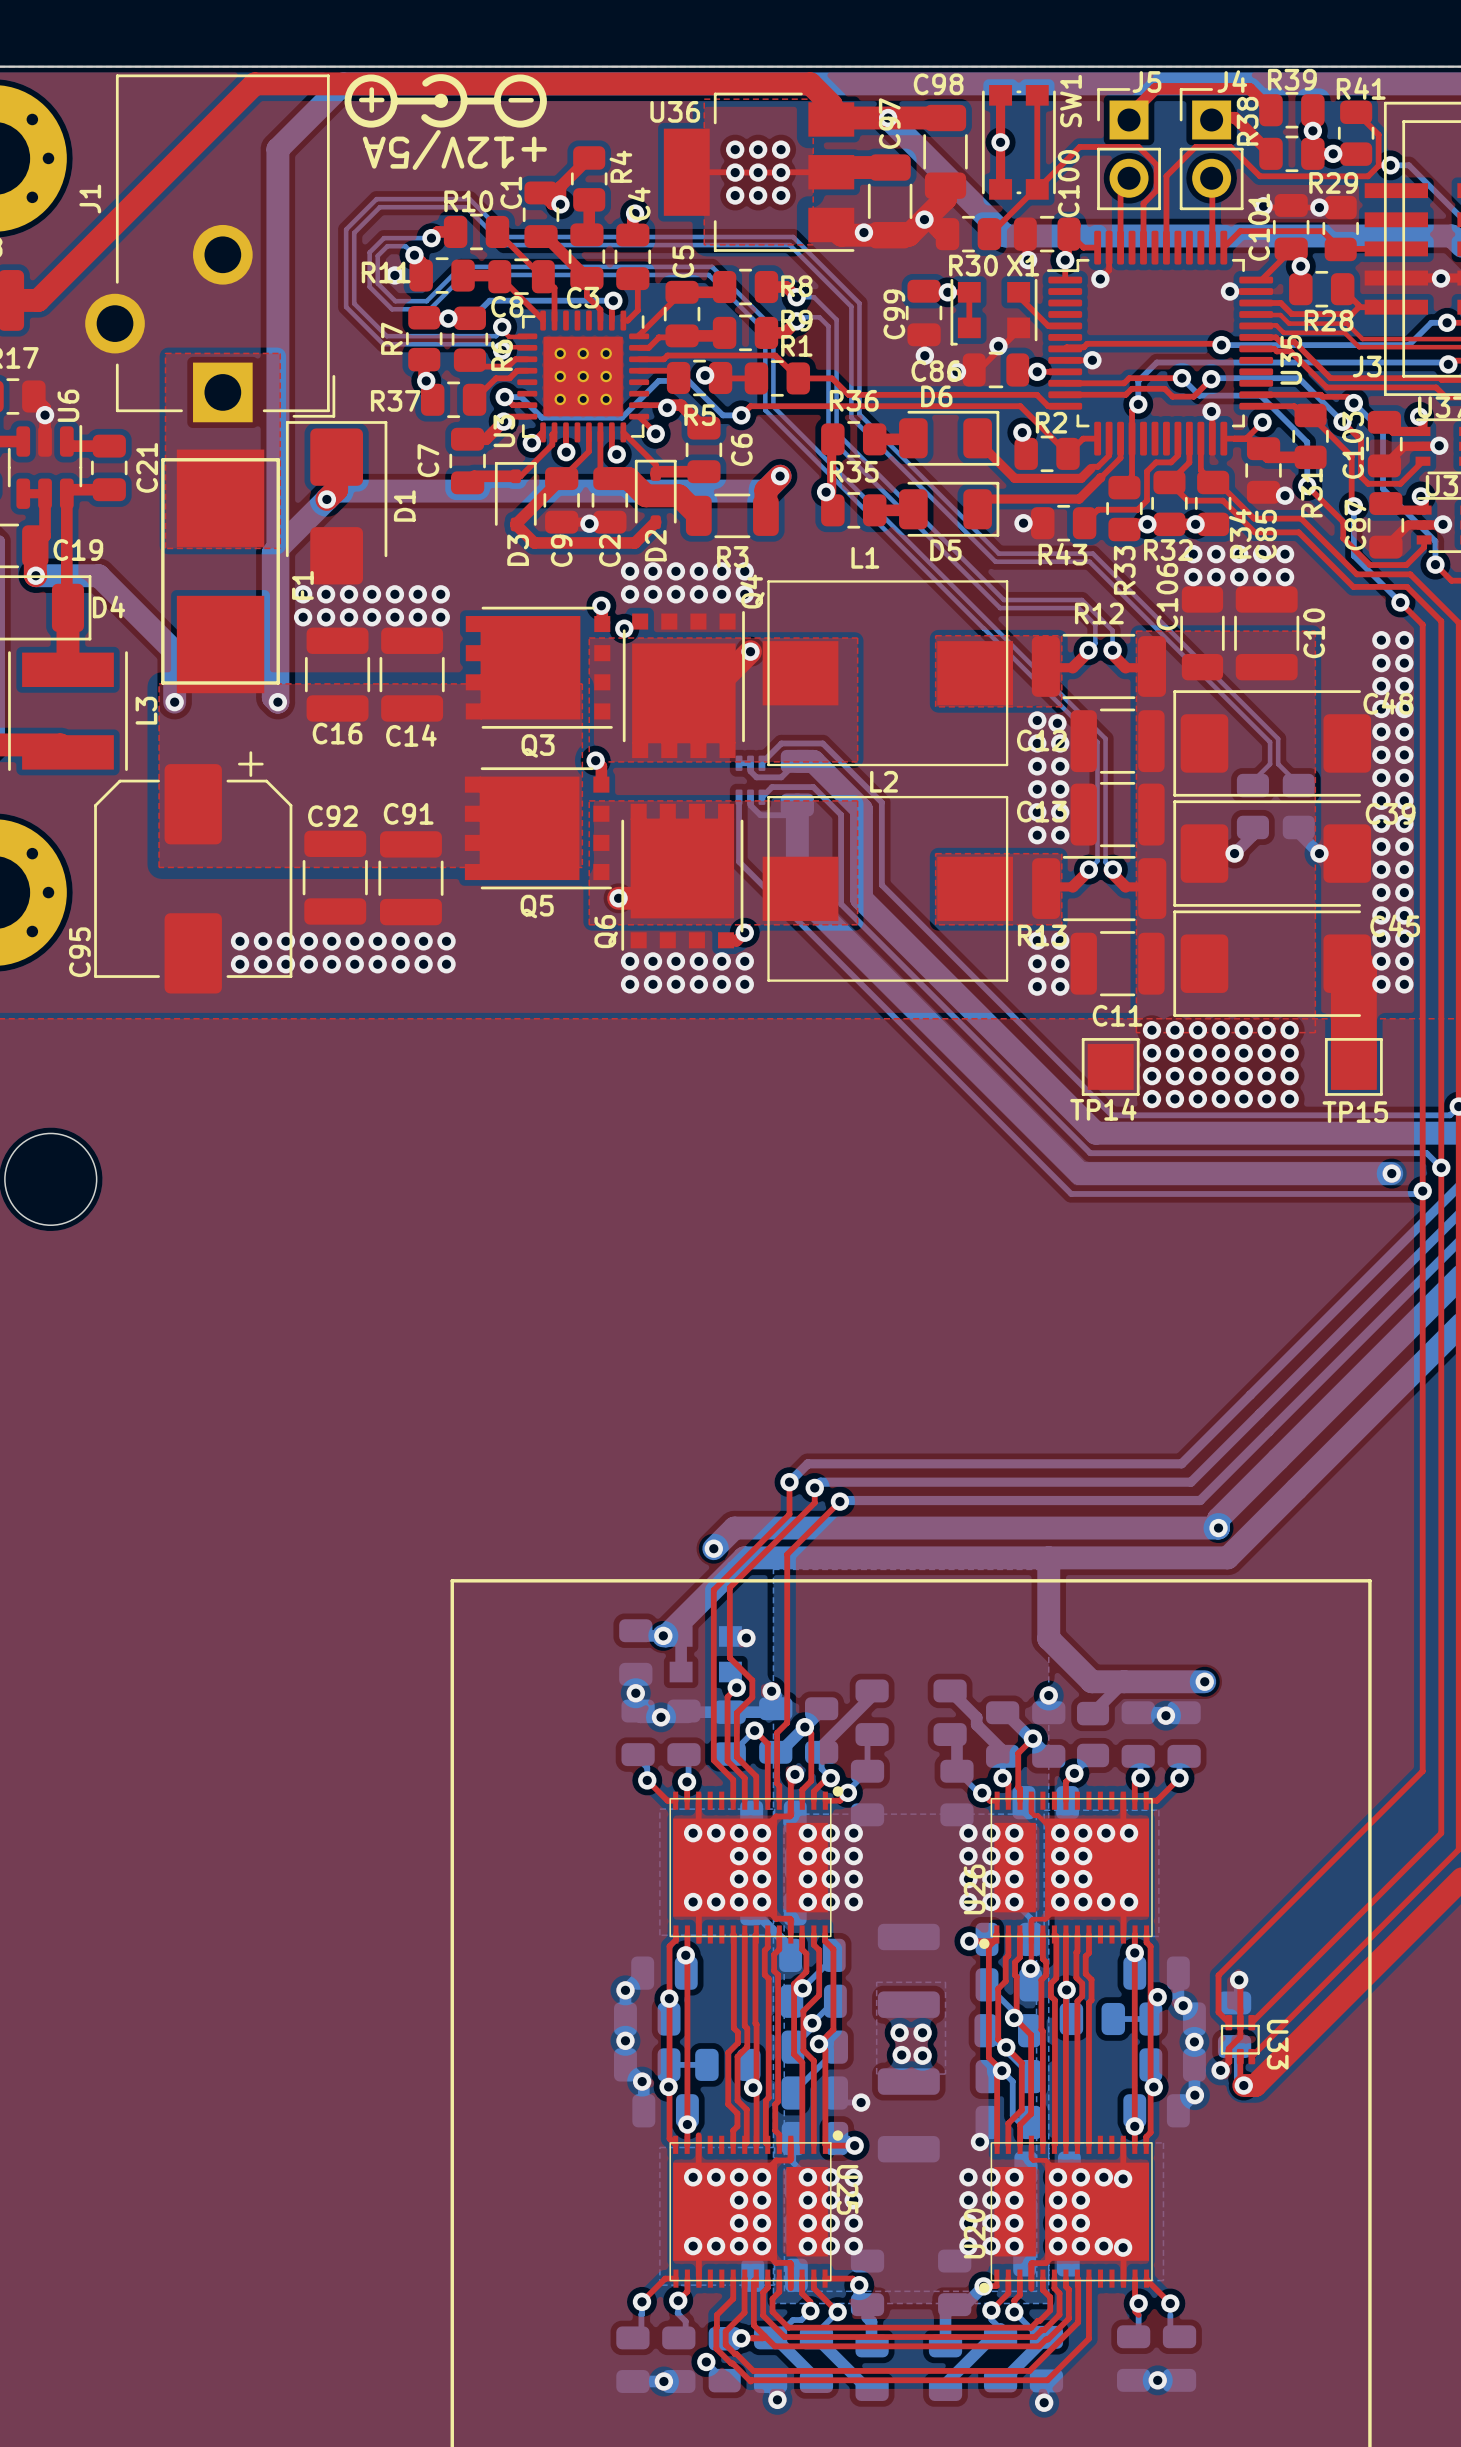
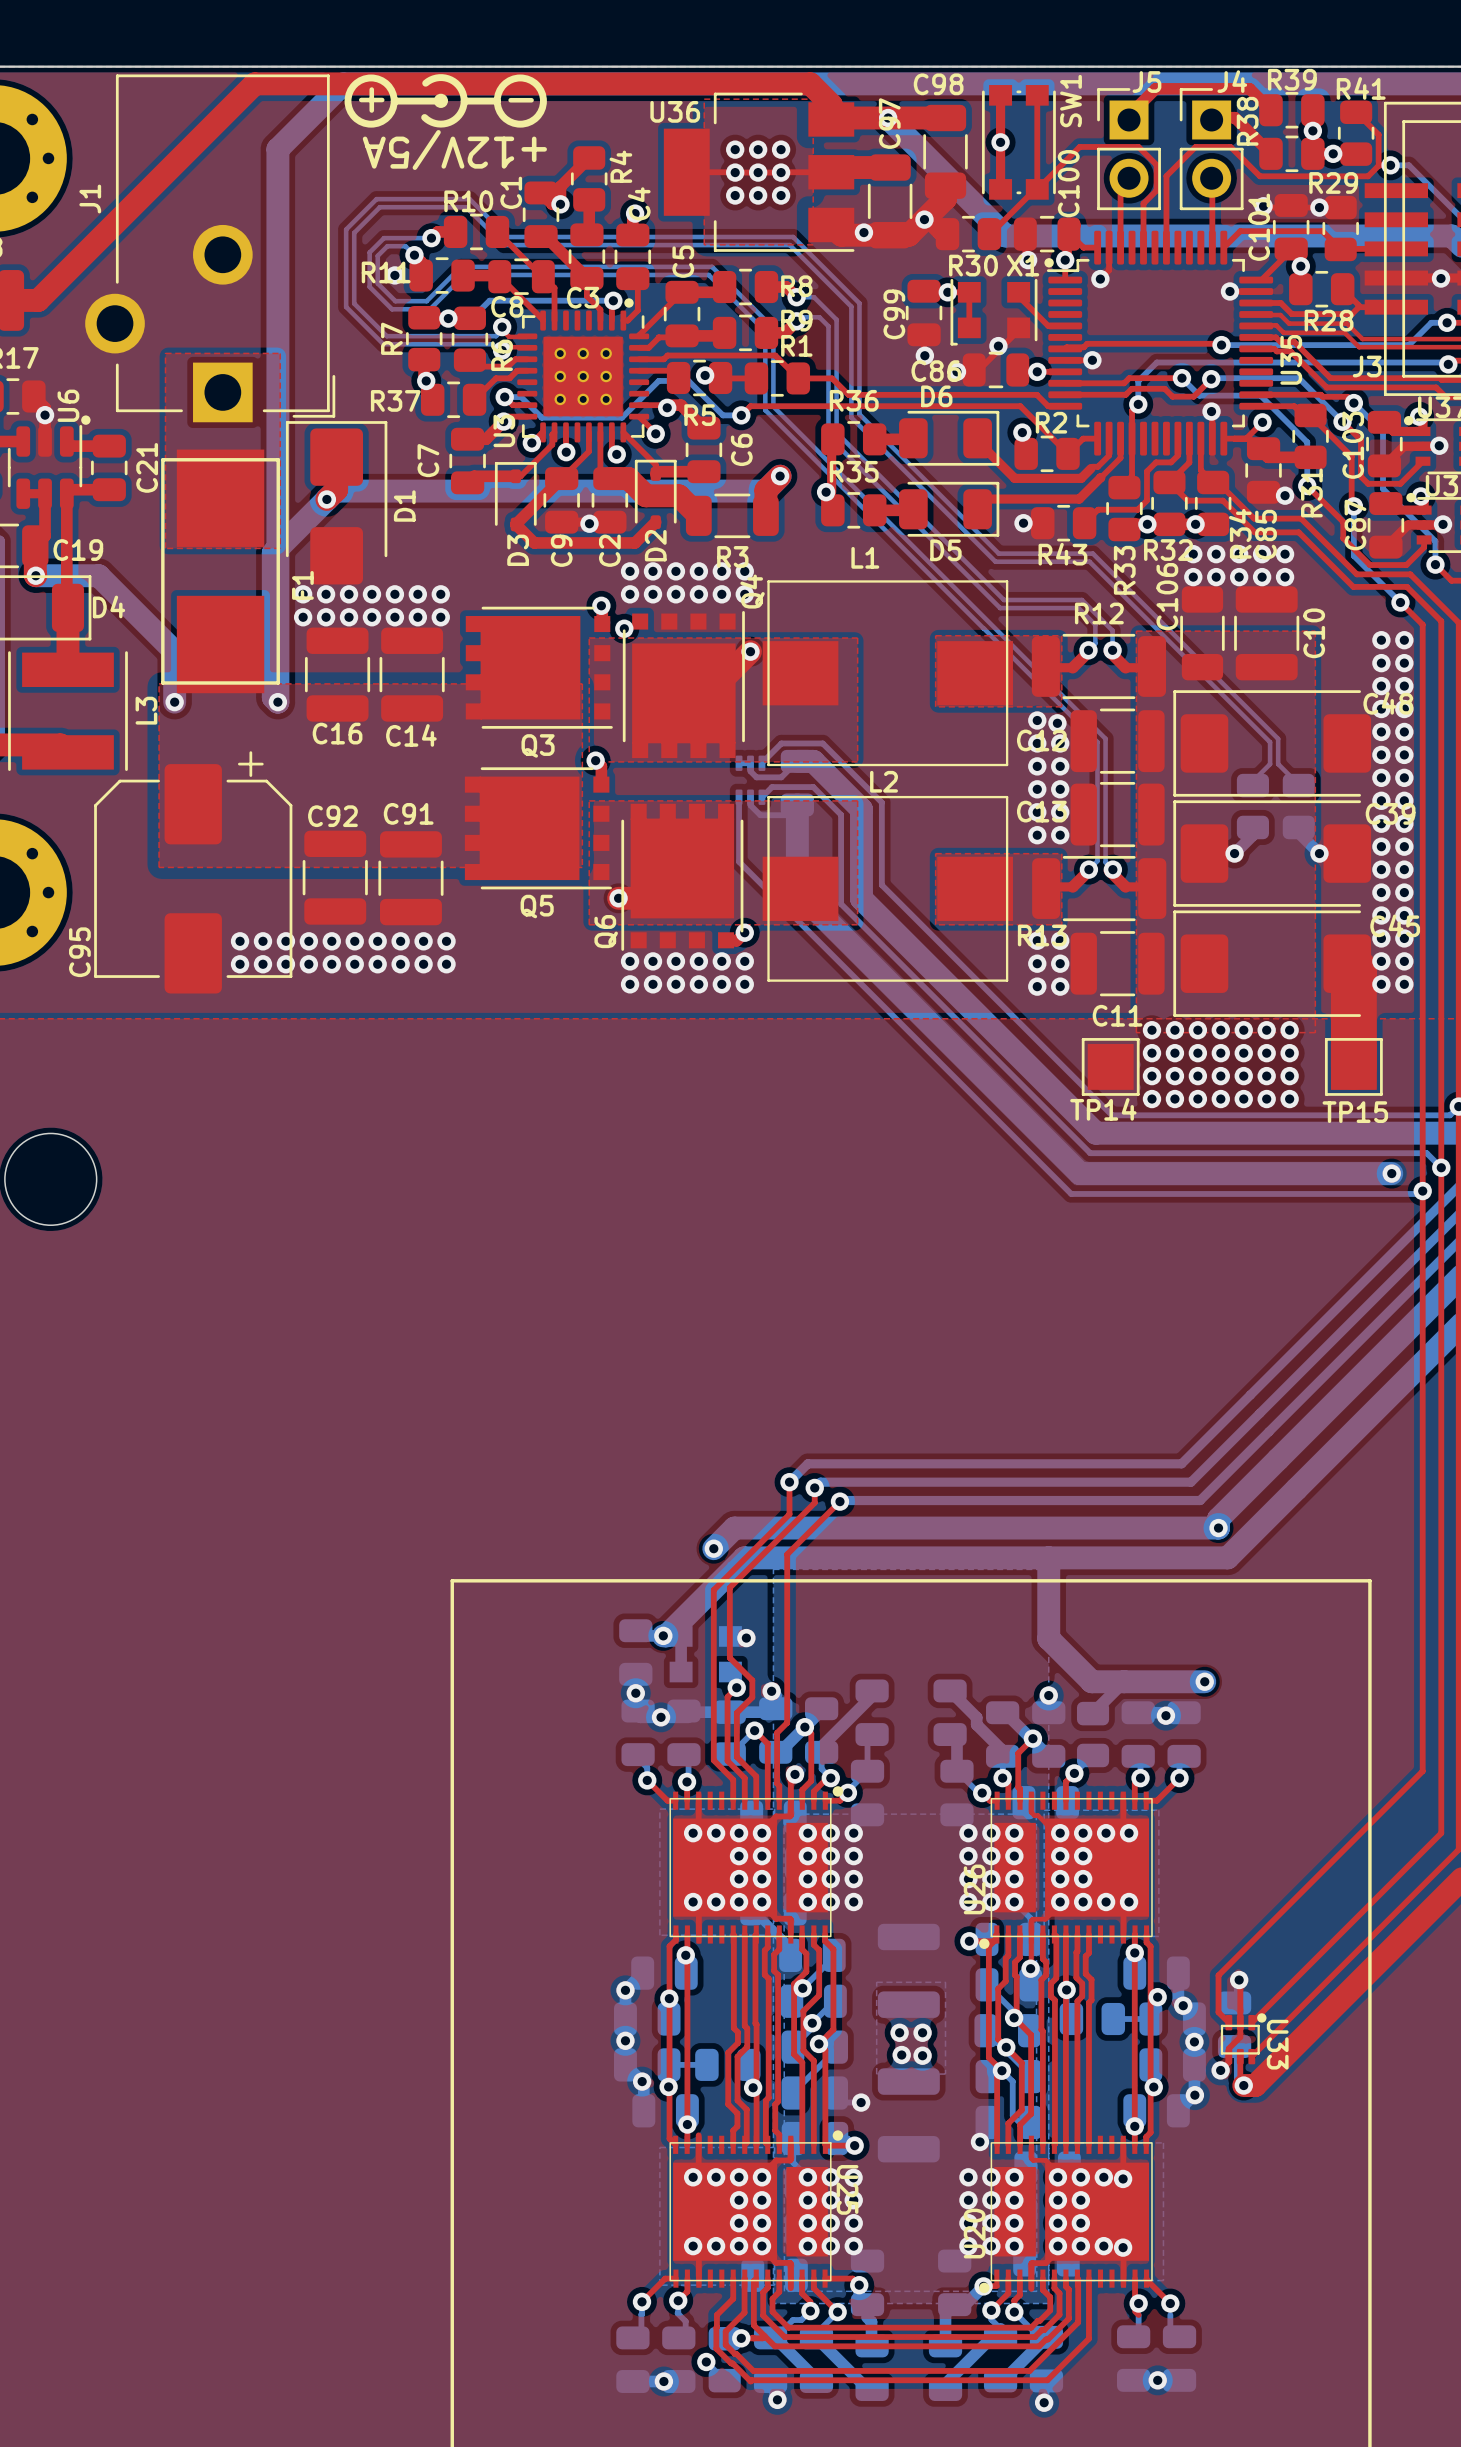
drawing: none -> [1044, 258, 1054, 268]
drawing: none -> [624, 298, 634, 308]
drawing: none -> [81, 415, 91, 425]
drawing: none -> [1403, 416, 1414, 426]
drawing: none -> [1406, 492, 1416, 503]
drawing: none -> [1257, 2013, 1267, 2023]

